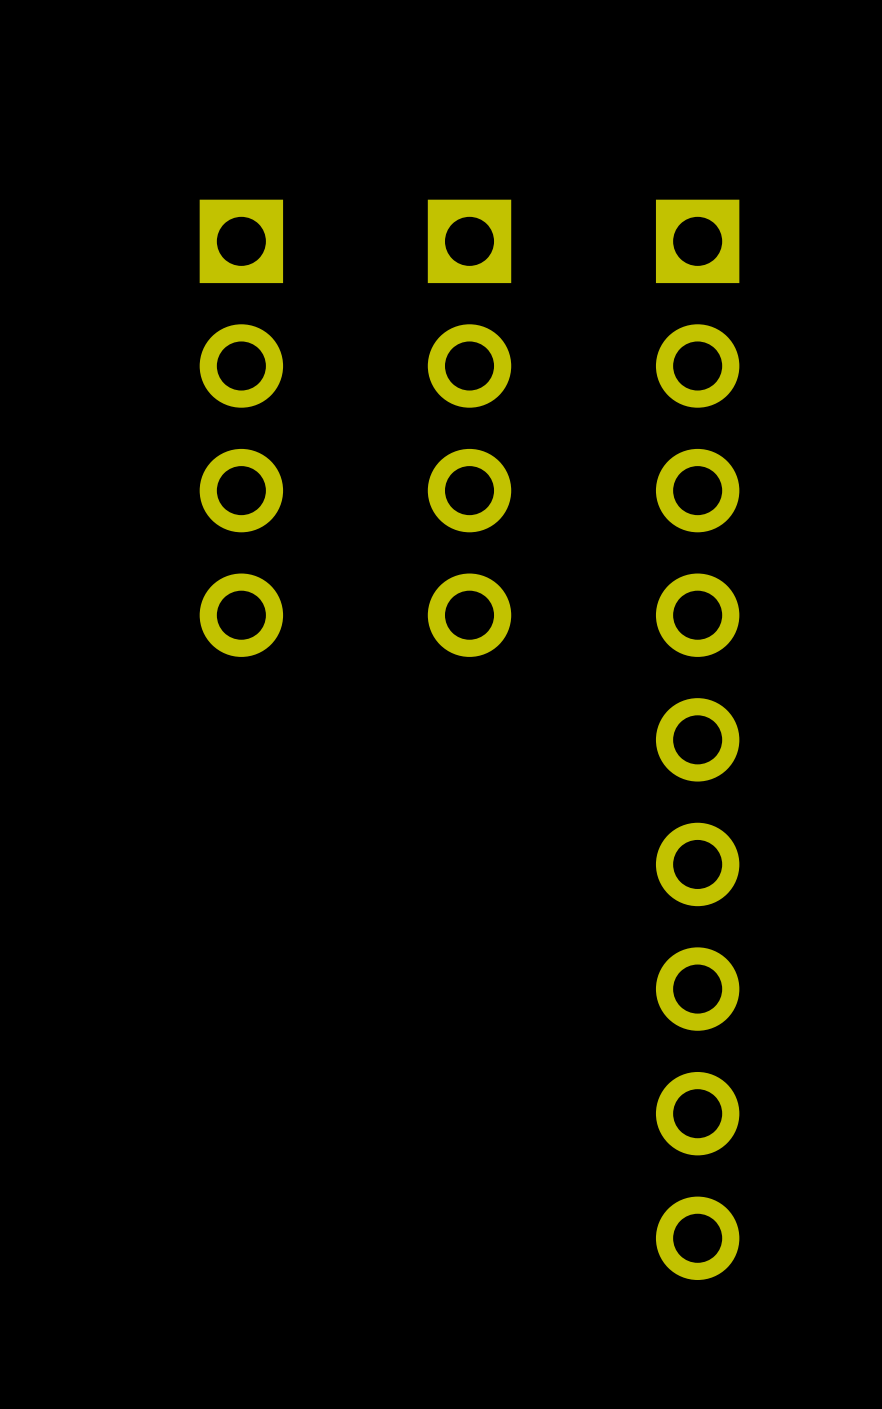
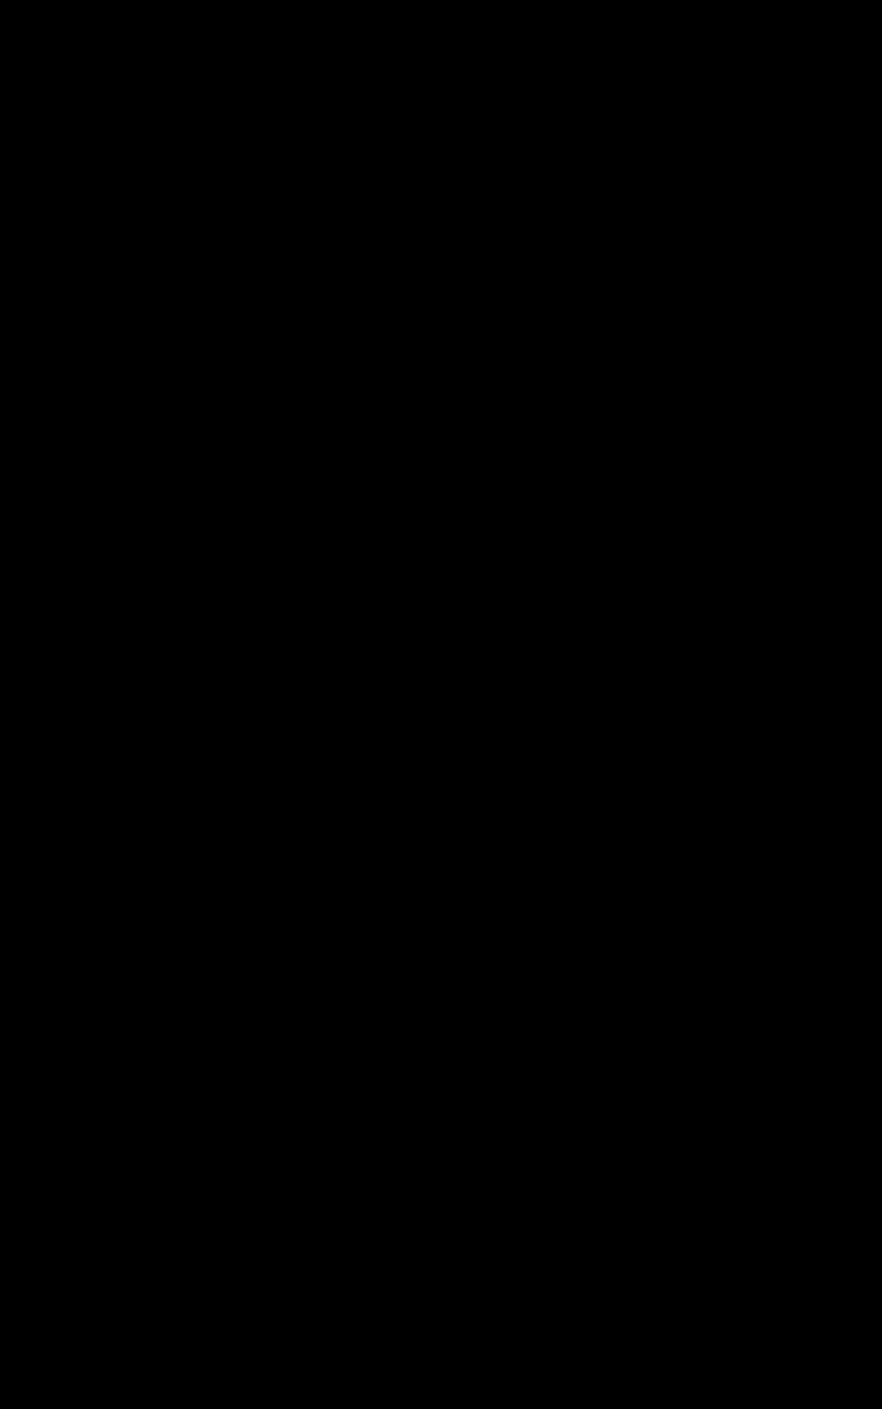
part: (241, 428) -> none
part: (469, 428) -> none
part: (697, 739) -> none

